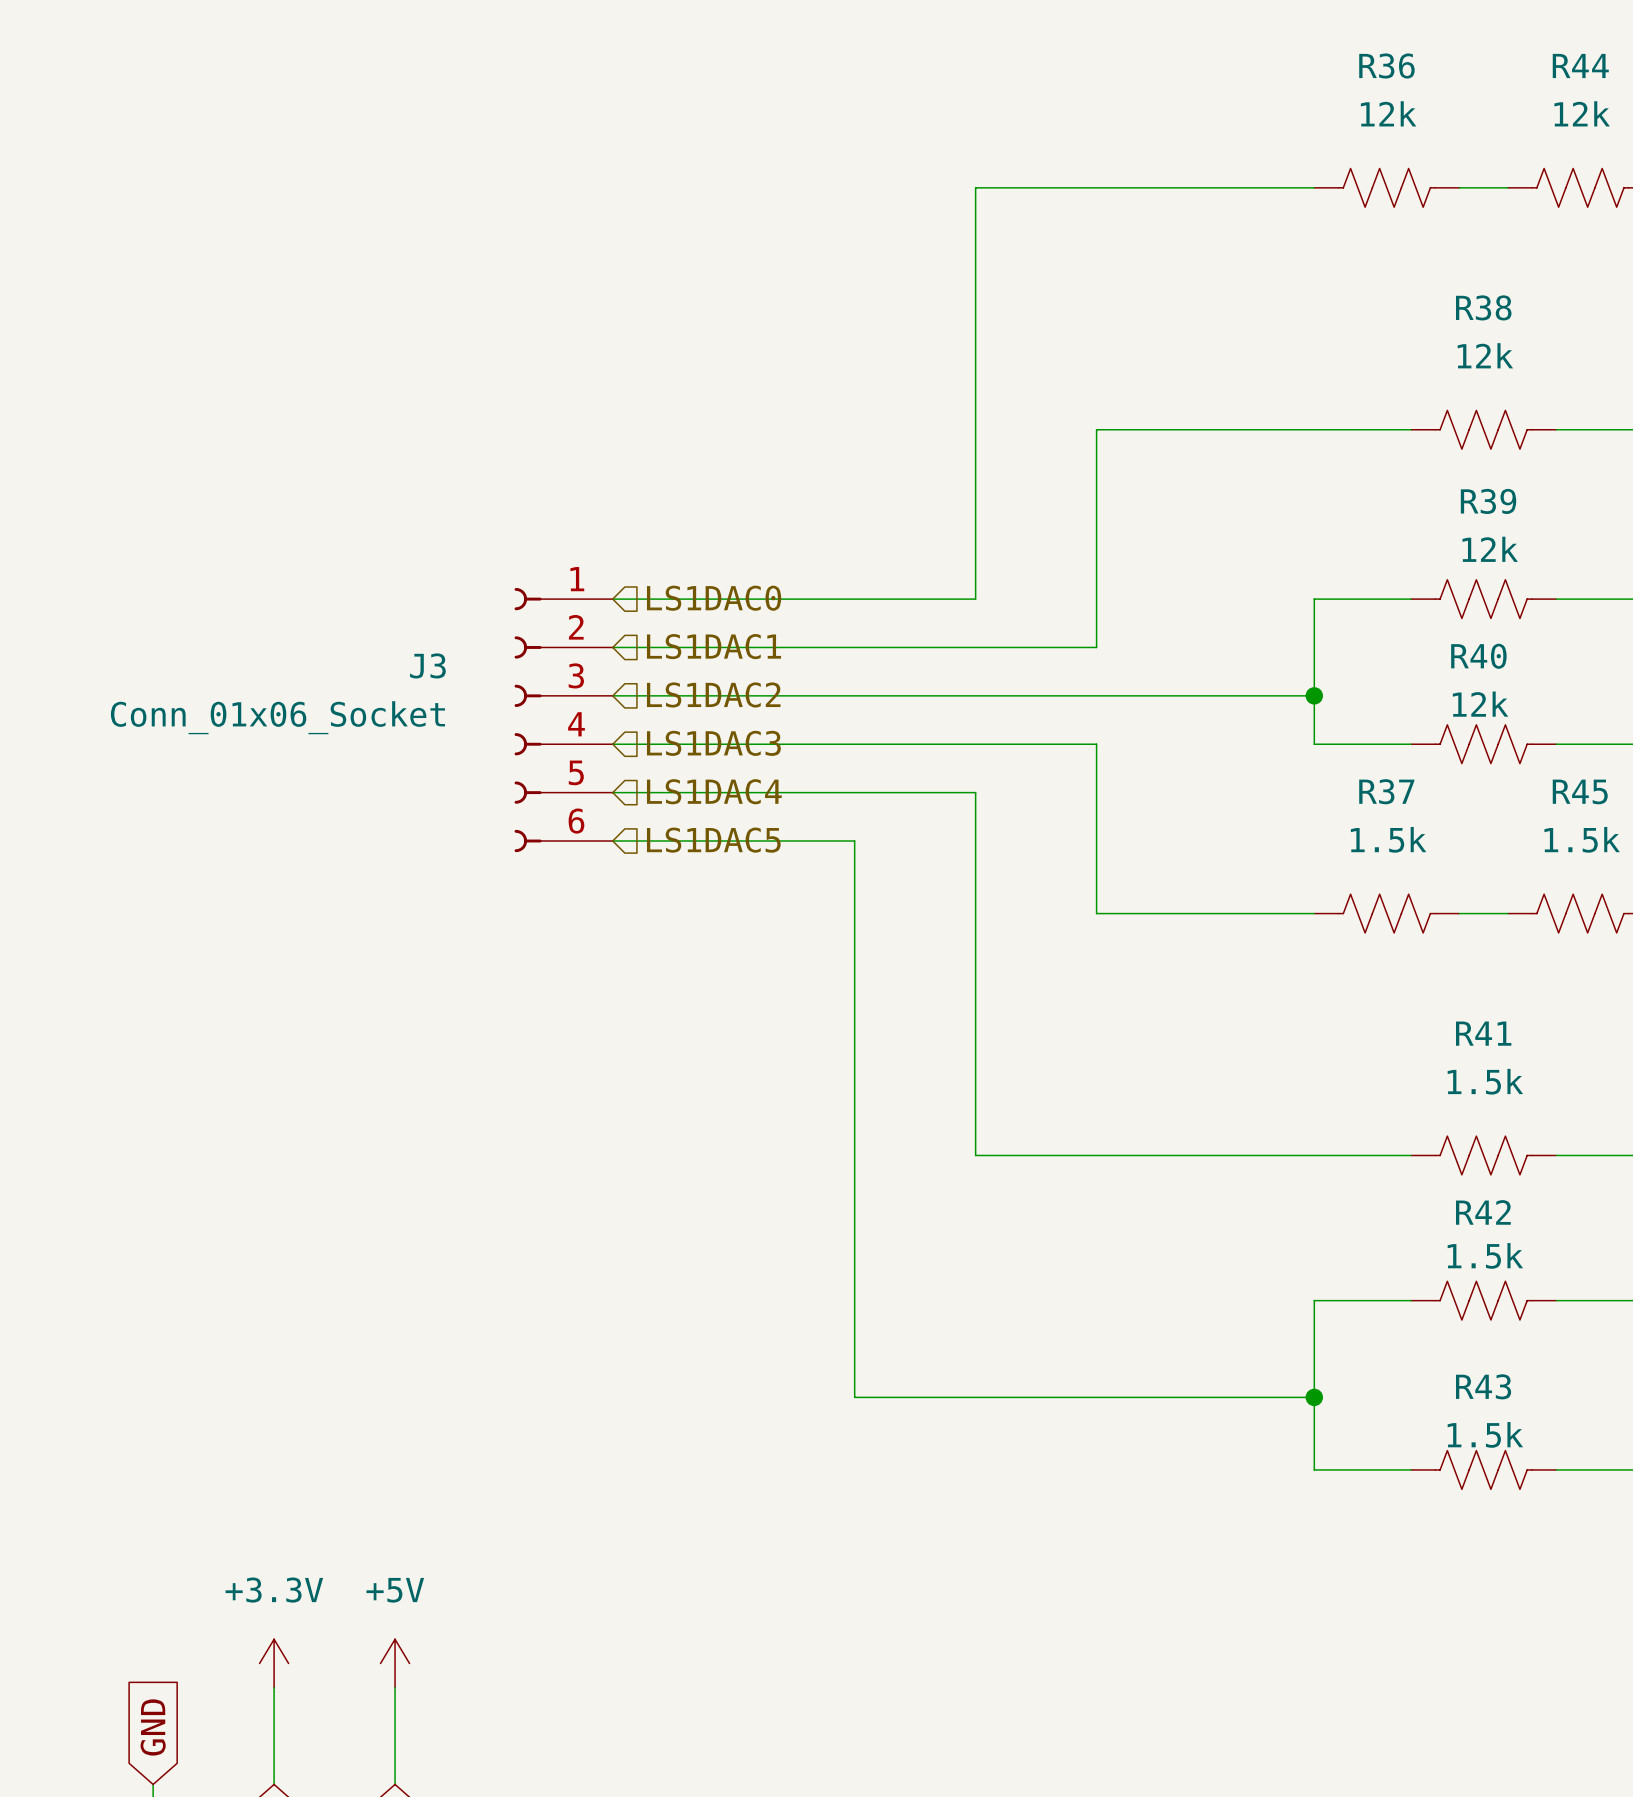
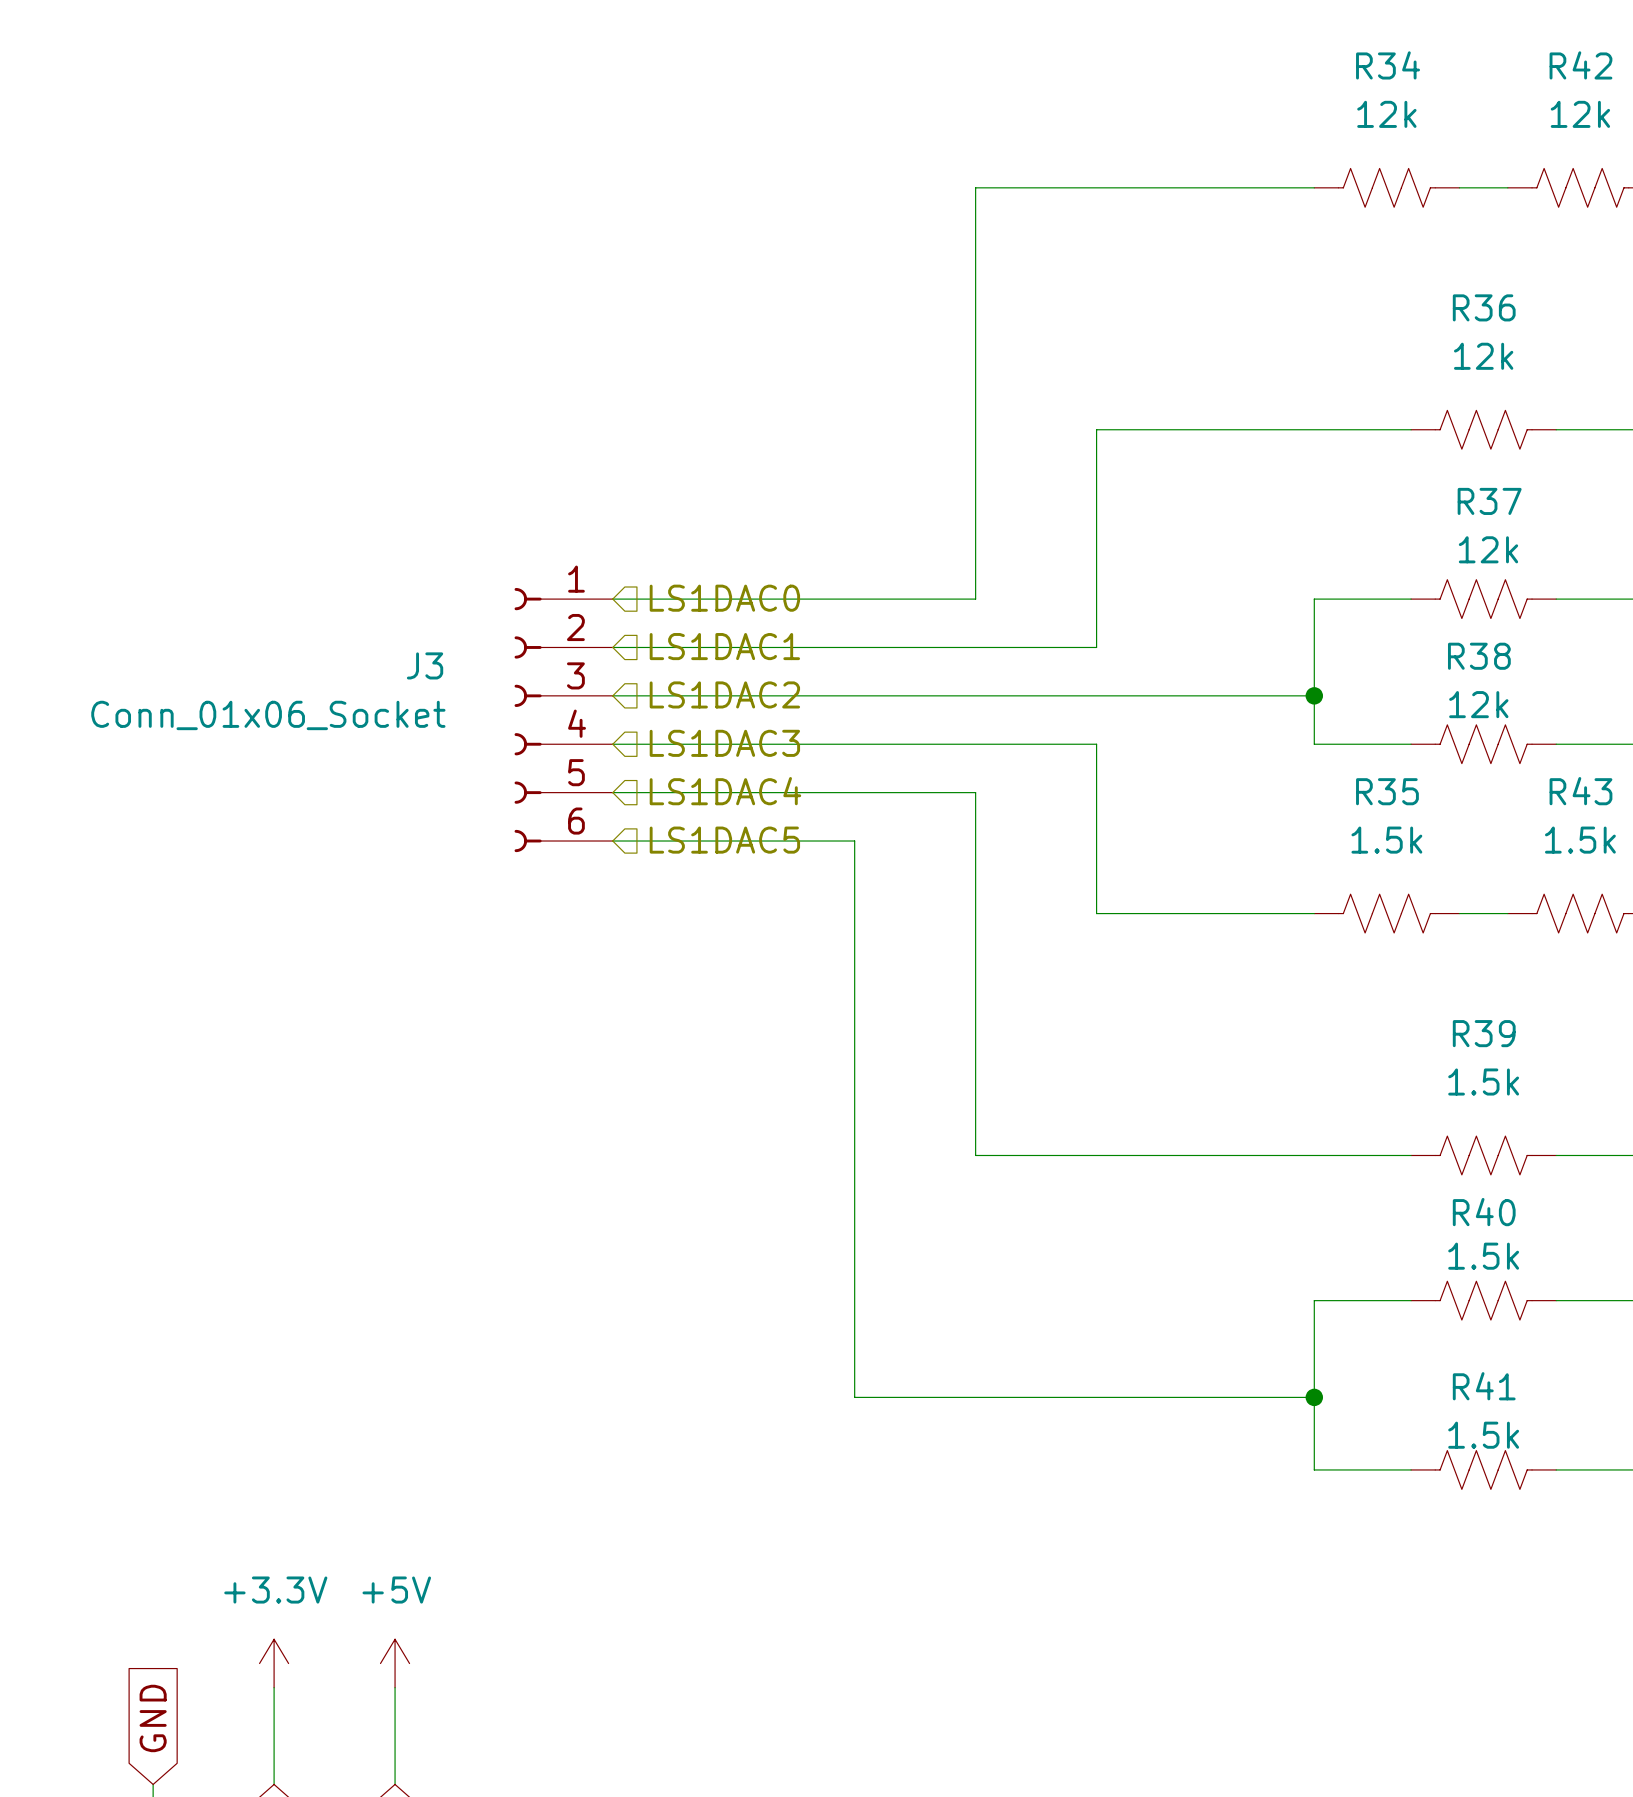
R44 name: R44 (1580, 65) -> R42 (1580, 65)
R36 name: R36 (1386, 66) -> R34 (1388, 65)
R38 name: R38 (1483, 307) -> R36 (1484, 307)
R39 name: R39 (1488, 501) -> R37 (1489, 501)
R40 name: R40 (1478, 656) -> R38 (1479, 656)
R37 name: R37 (1386, 791) -> R35 (1387, 791)
R45 name: R45 (1580, 791) -> R43 (1580, 791)
R41 name: R41 (1483, 1033) -> R39 (1484, 1033)
R42 name: R42 (1483, 1212) -> R40 (1484, 1212)
R43 name: R43 (1483, 1386) -> R41 (1484, 1386)

